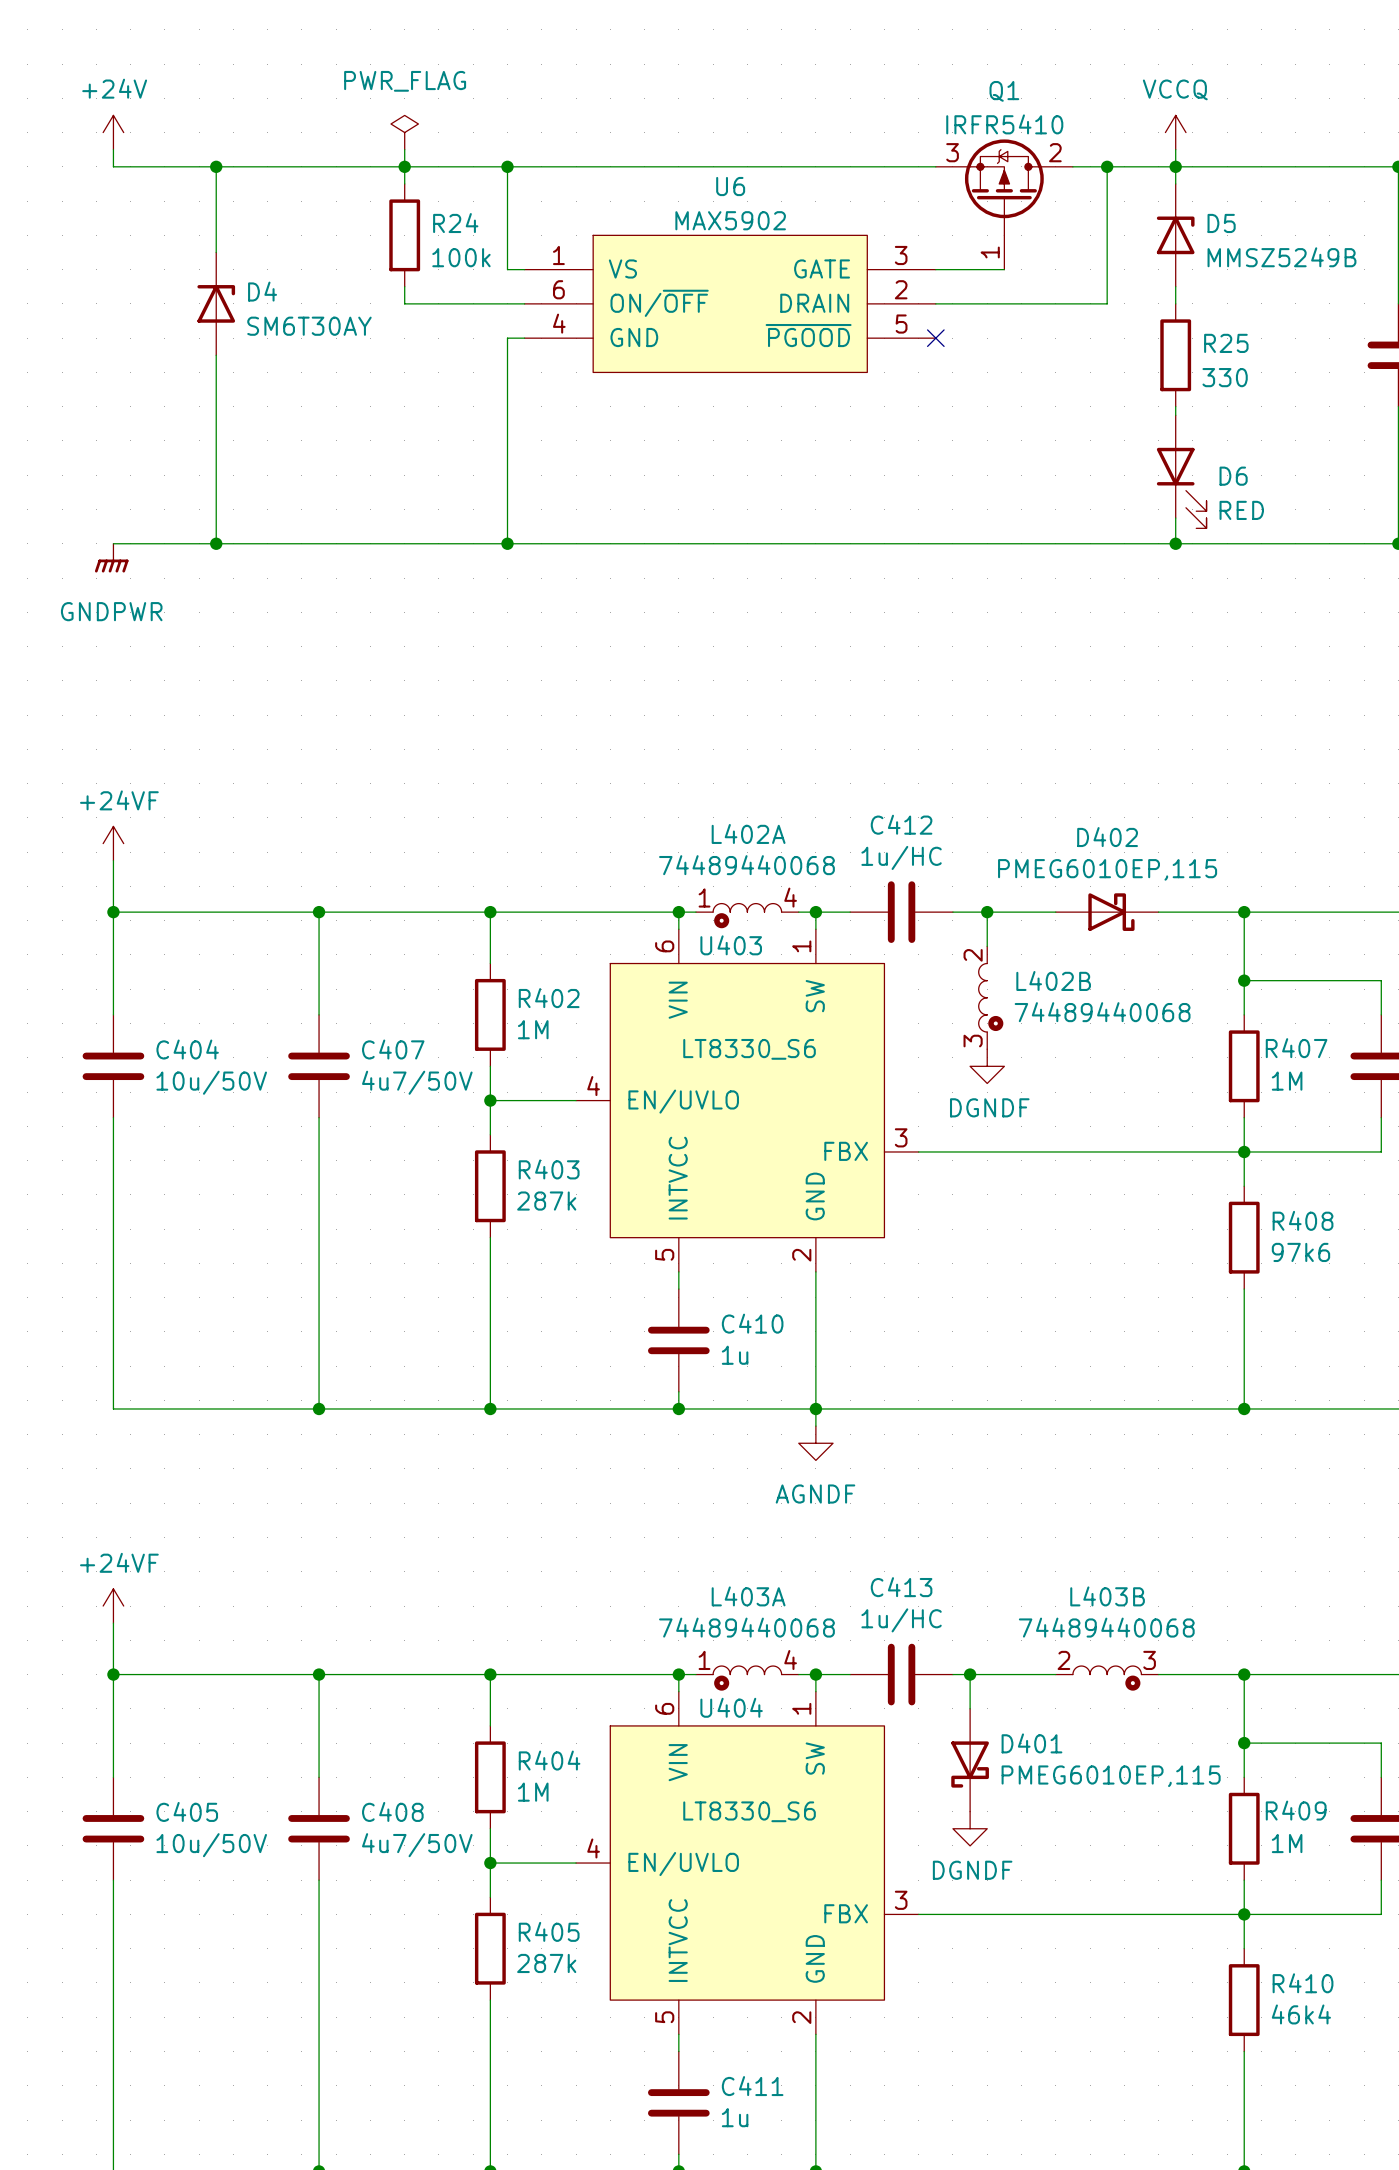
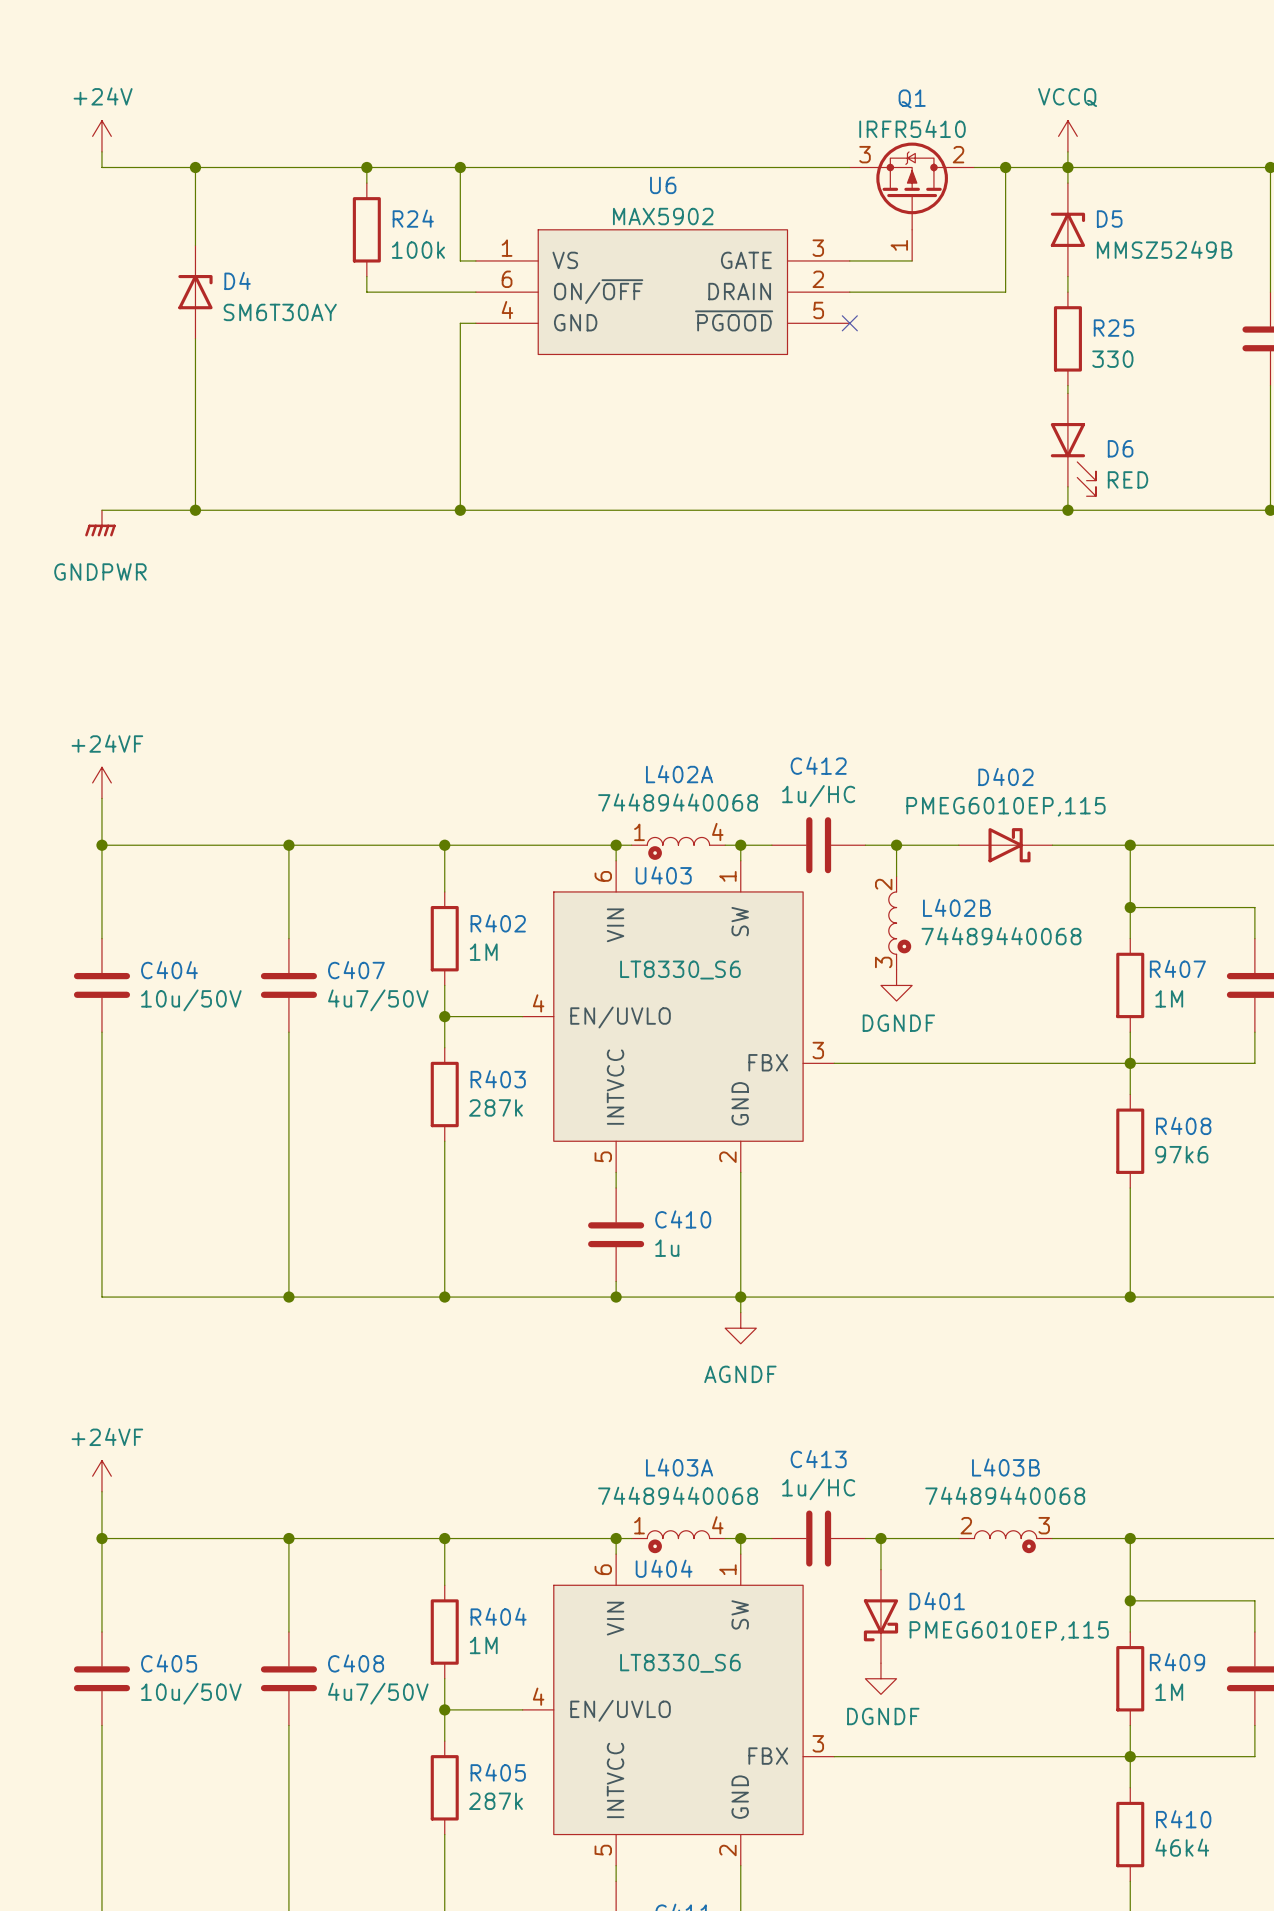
power symbol: PWR_FLAG (404, 132) -> none
wire: (404, 149) (404, 166) -> none

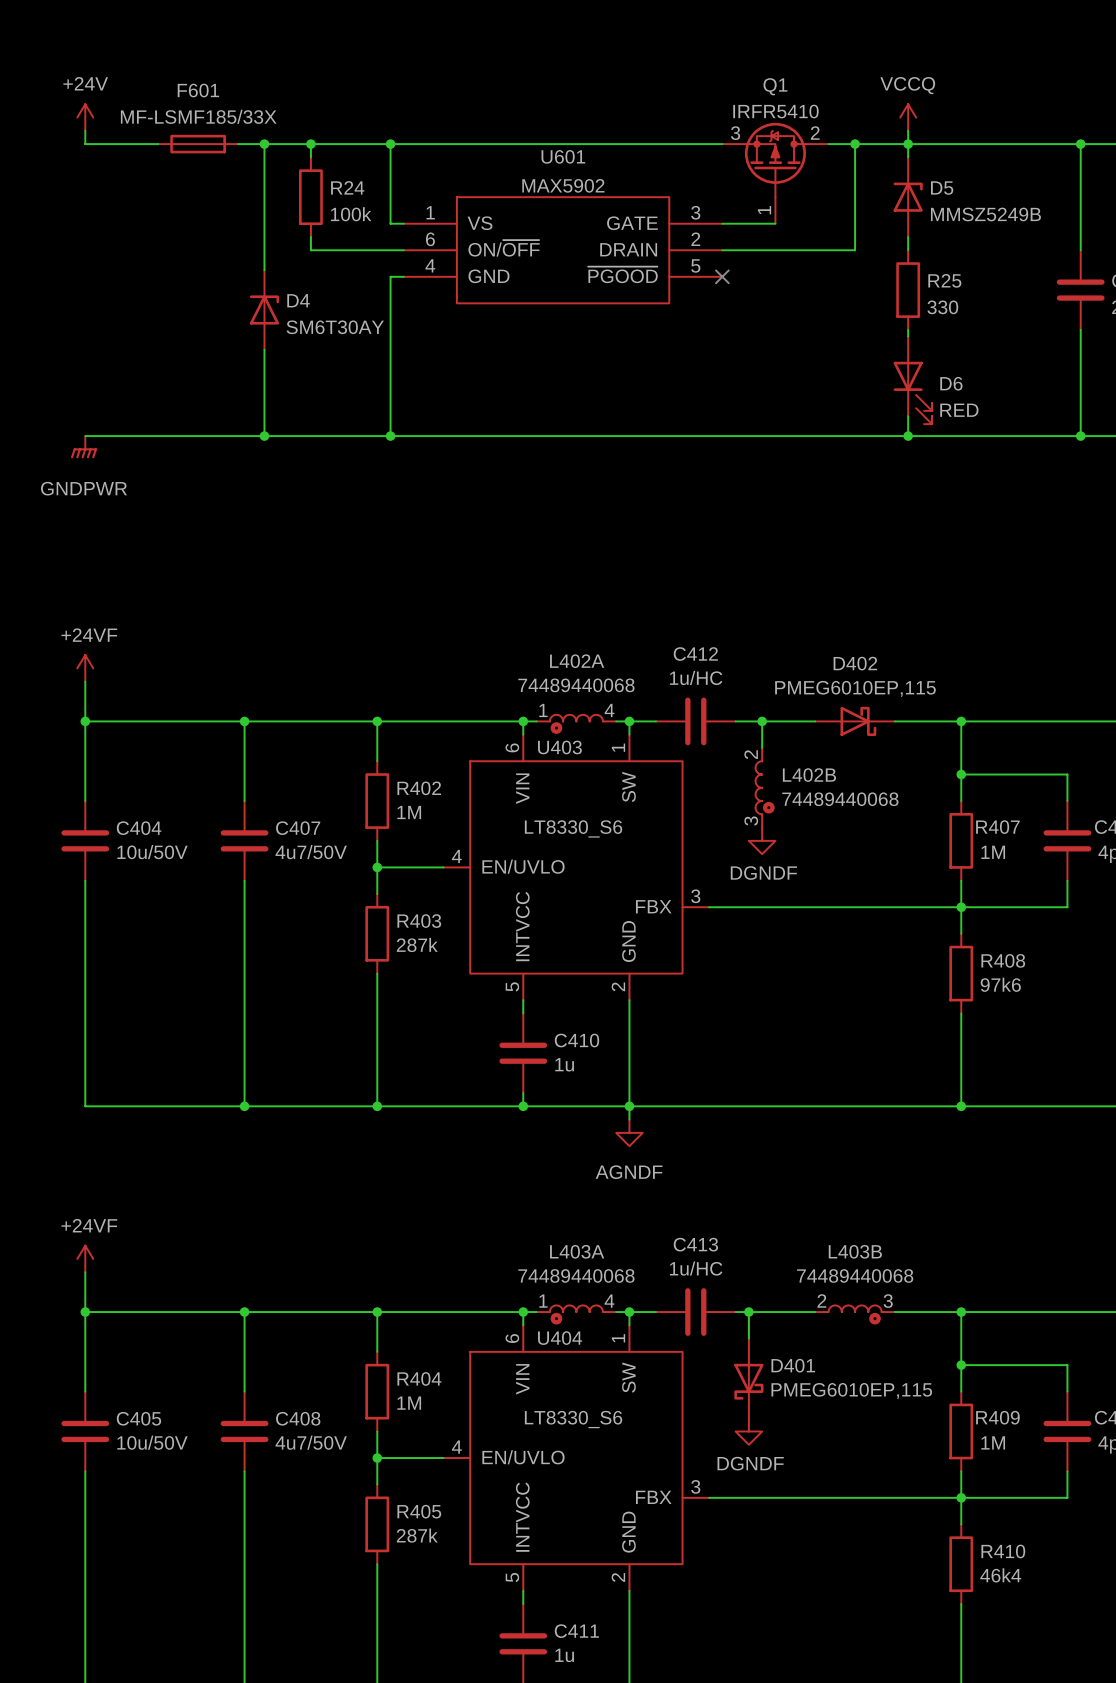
wire: (195, 167) (195, 245) -> none
junction: (195, 167) -> none
F601: none -> MF-LSMF185/33X (198, 144)
wire: none -> (264, 144) (264, 270)
junction: none -> (264, 144)
U6 name: U6 (663, 185) -> U601 (563, 156)
D4 position: (195, 292) -> (264, 309)
wire: (195, 338) (195, 510) -> none
wire: none -> (264, 349) (264, 436)
junction: (195, 510) -> none
junction: none -> (264, 436)

